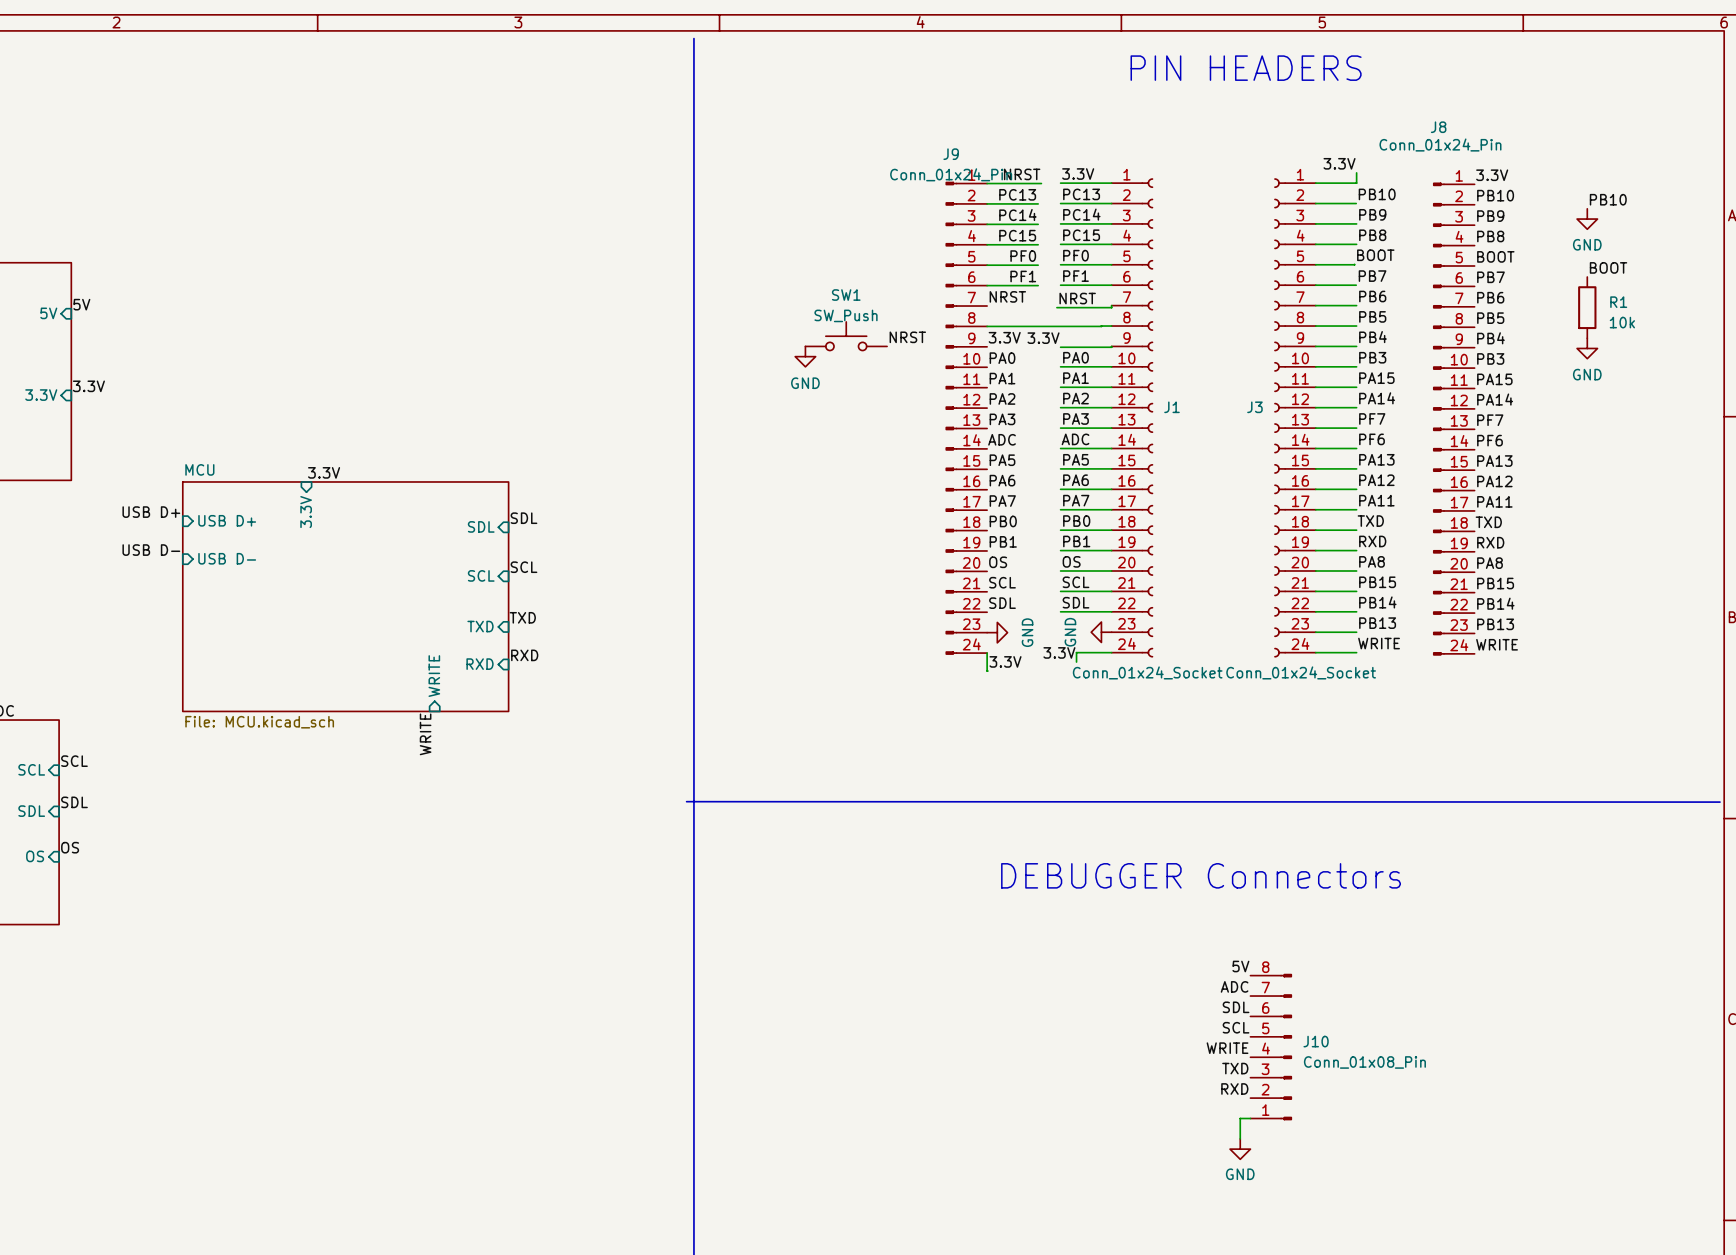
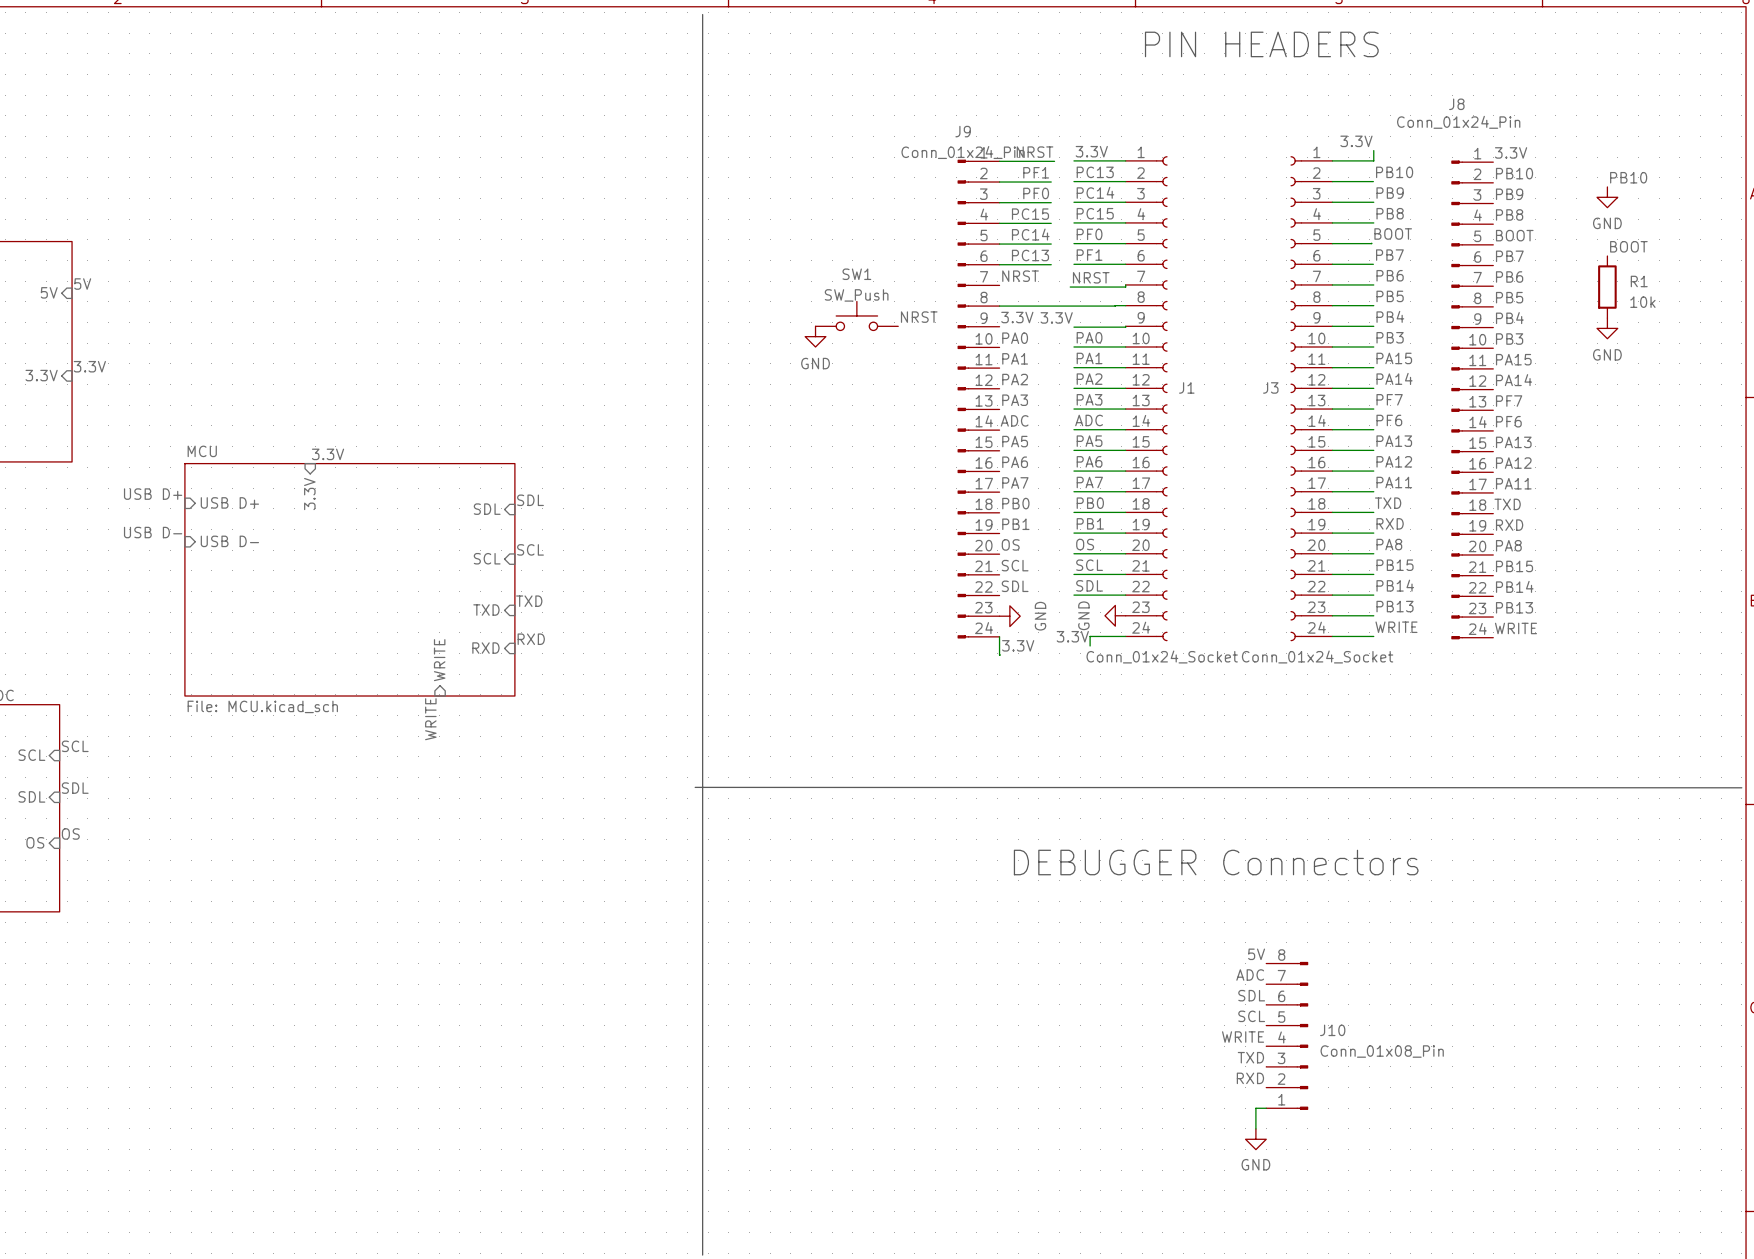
label: PC13 (1017, 194) -> PF1 (1036, 172)
label: PC14 (1017, 215) -> PF0 (1036, 193)
label: PF0 (1023, 256) -> PC14 (1030, 234)
label: PF1 (1023, 276) -> PC13 (1030, 255)

